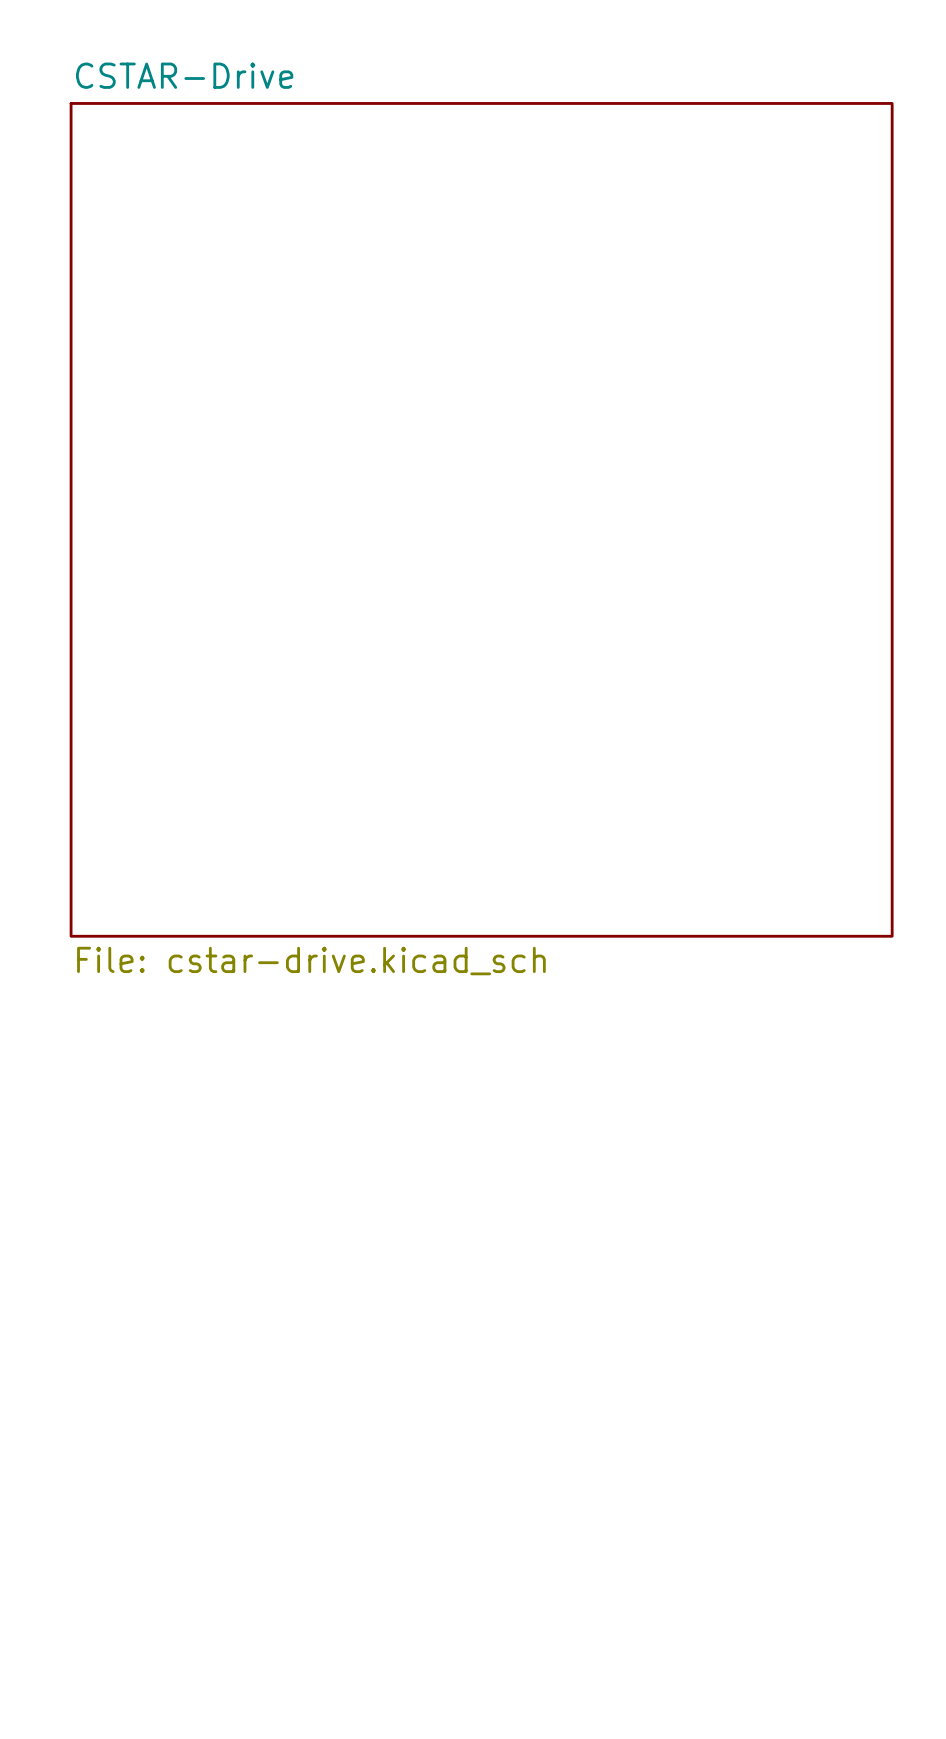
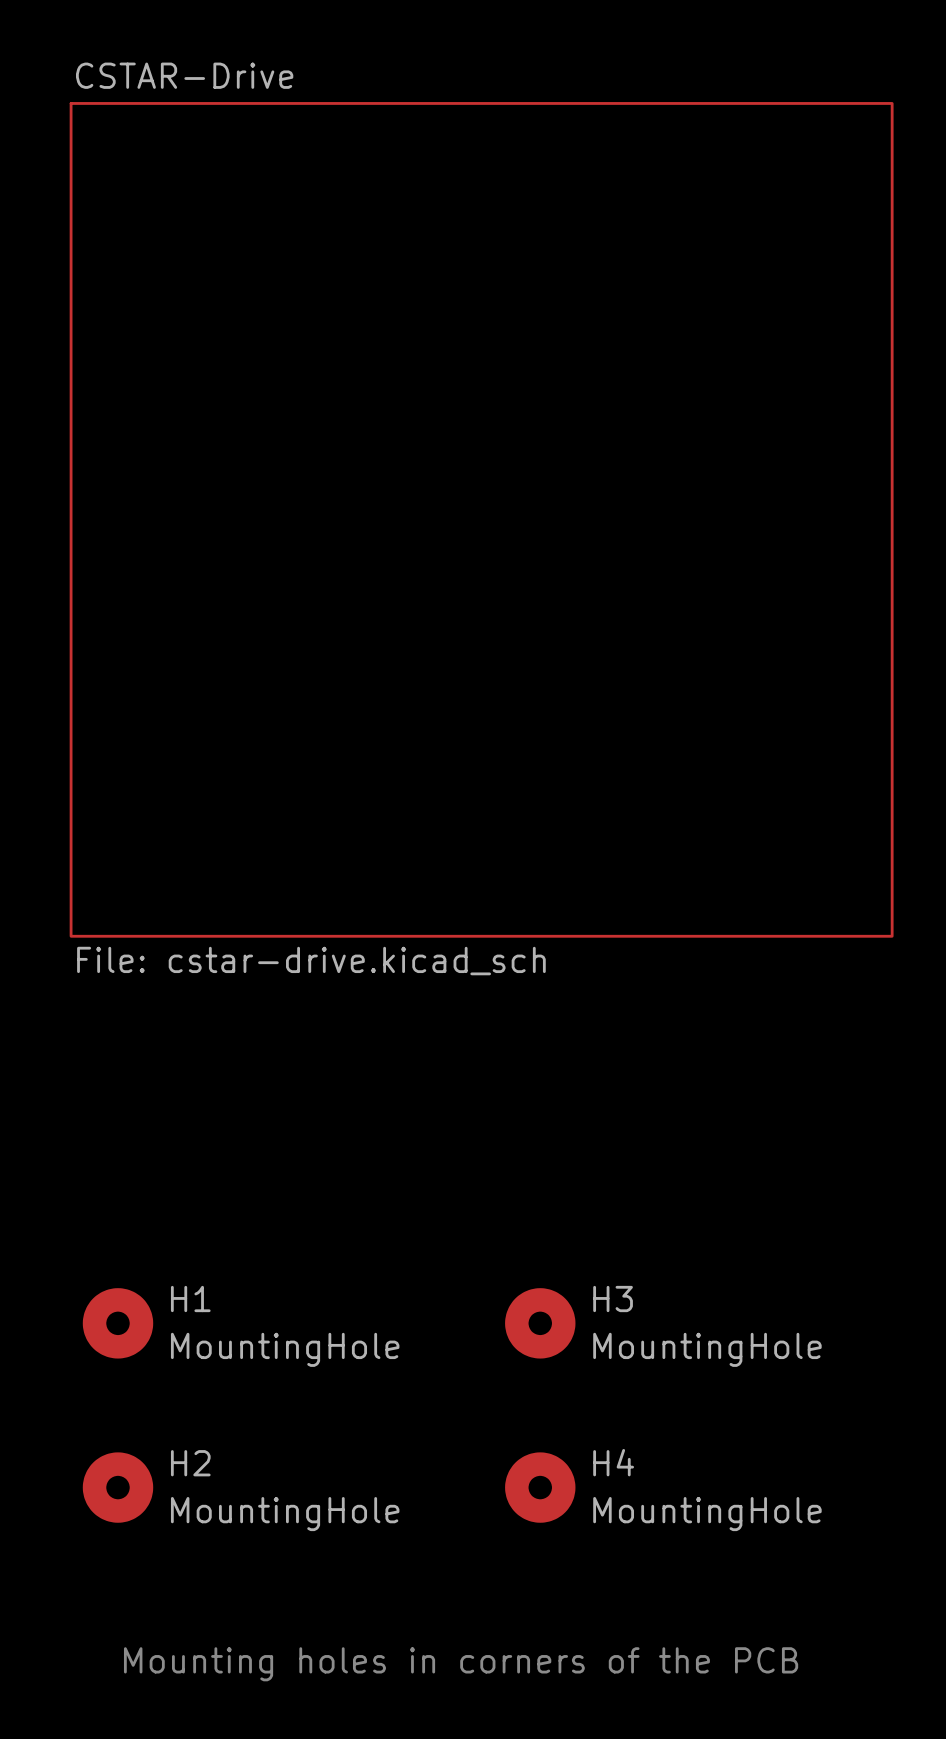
H1: none -> MountingHole (118, 1323)
H3: none -> MountingHole (540, 1323)
H2: none -> MountingHole (118, 1487)
H4: none -> MountingHole (540, 1487)
text: none -> Mounting holes in corners of the PCB (461, 1664)

